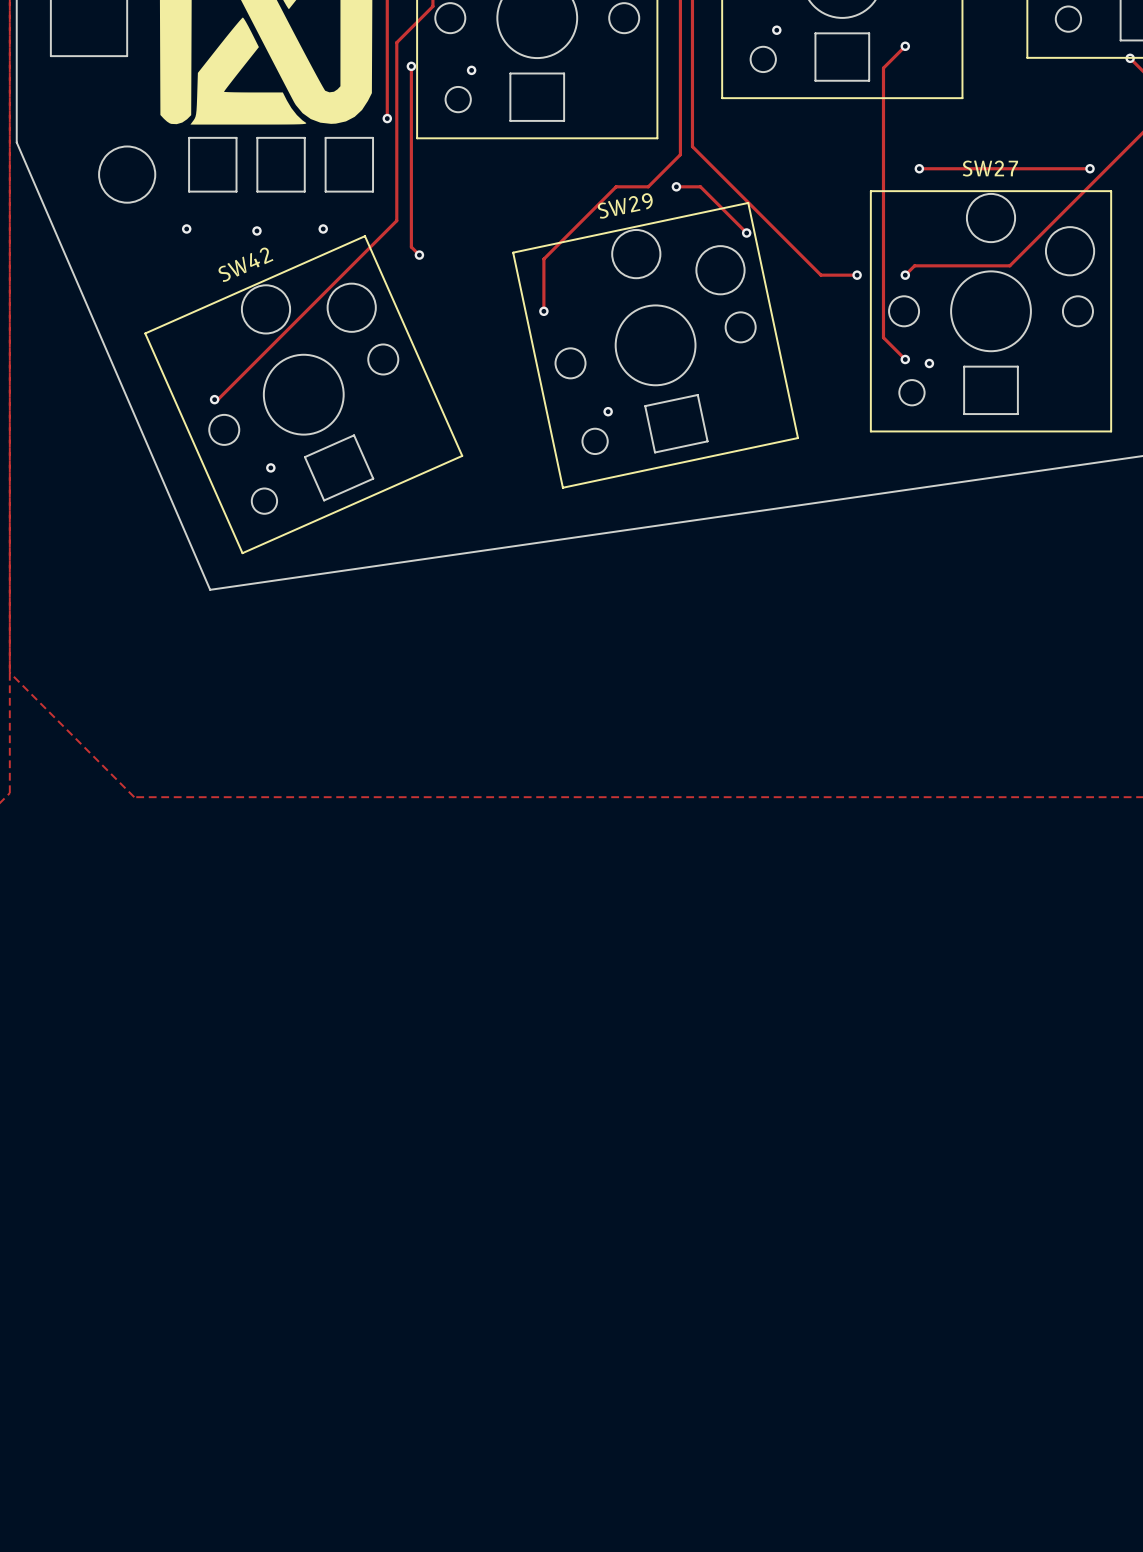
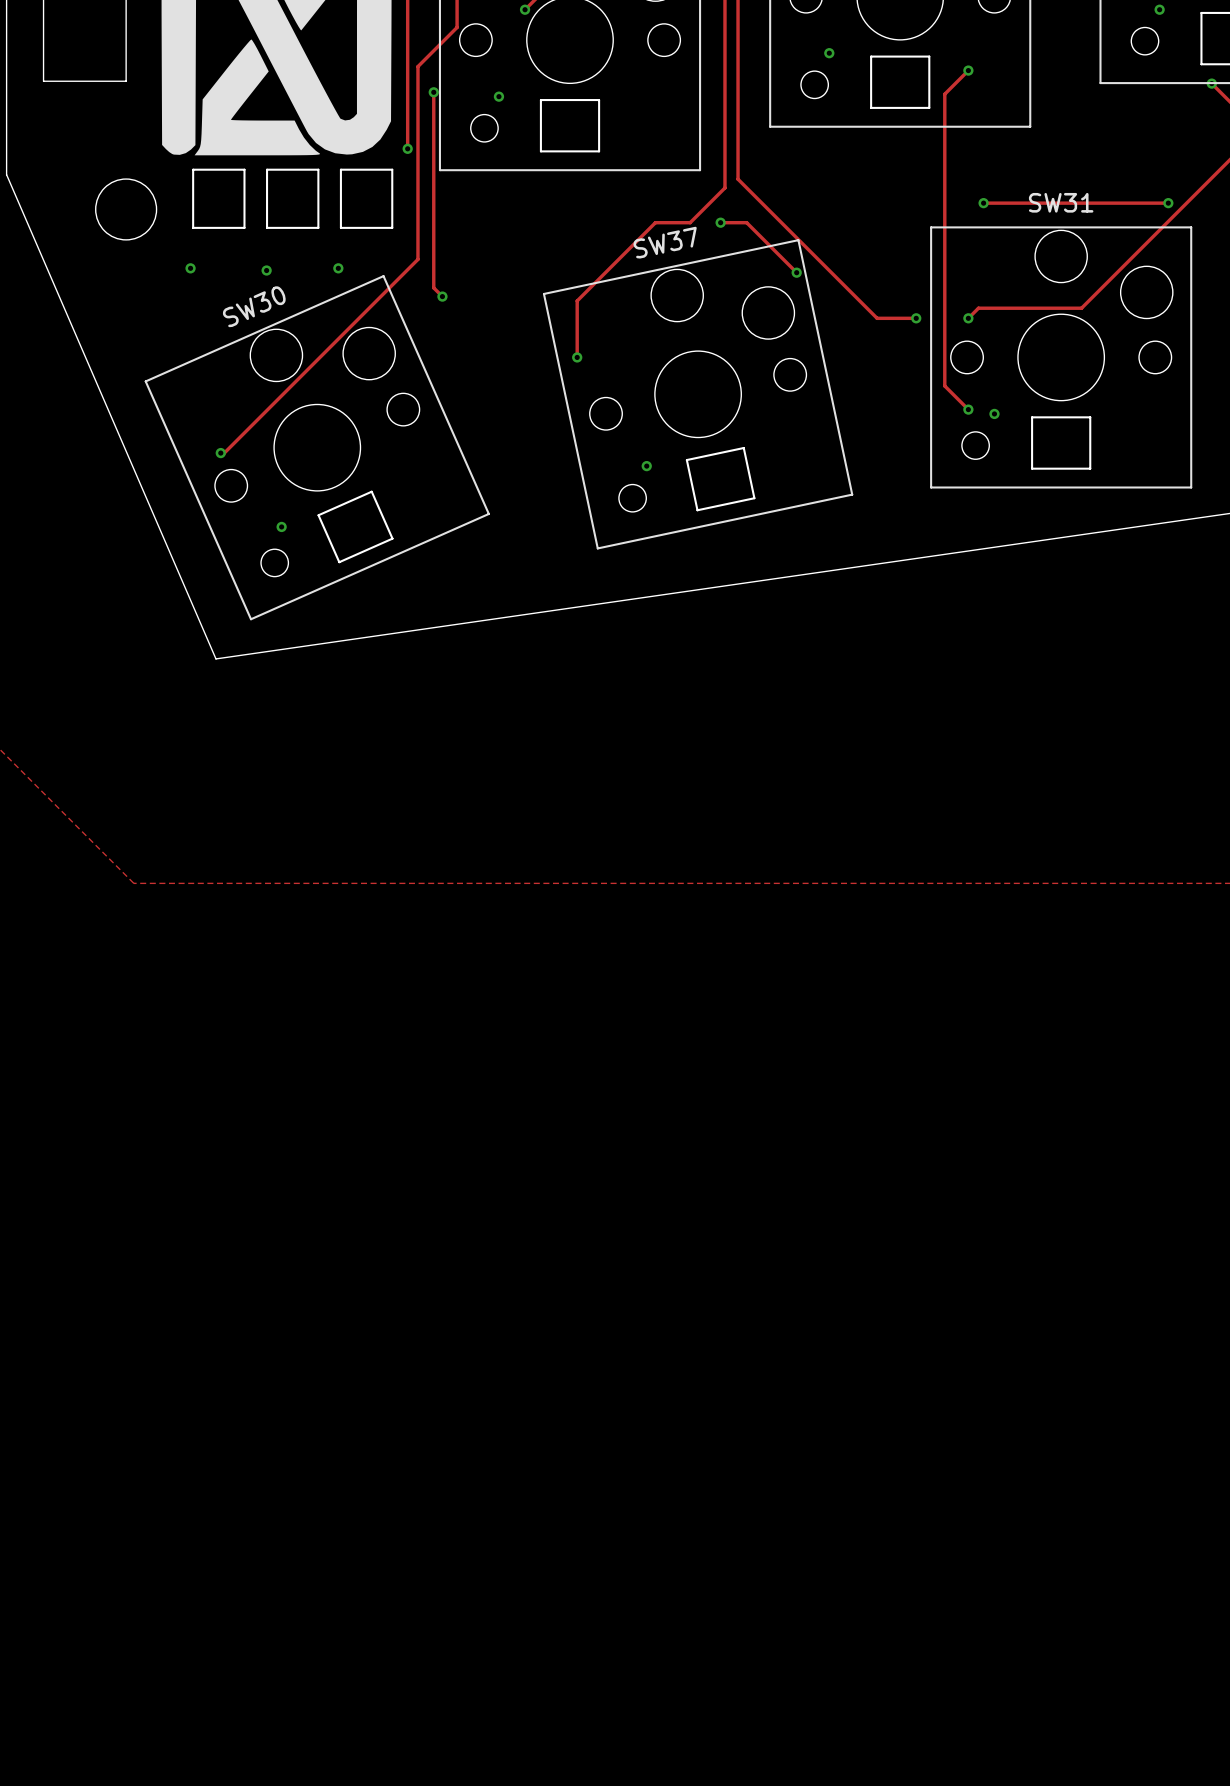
SW27 name: SW27 (990, 168) -> SW31 (1061, 202)
SW29 name: SW29 (625, 206) -> SW37 (665, 242)
SW42 name: SW42 (245, 264) -> SW30 (254, 306)

